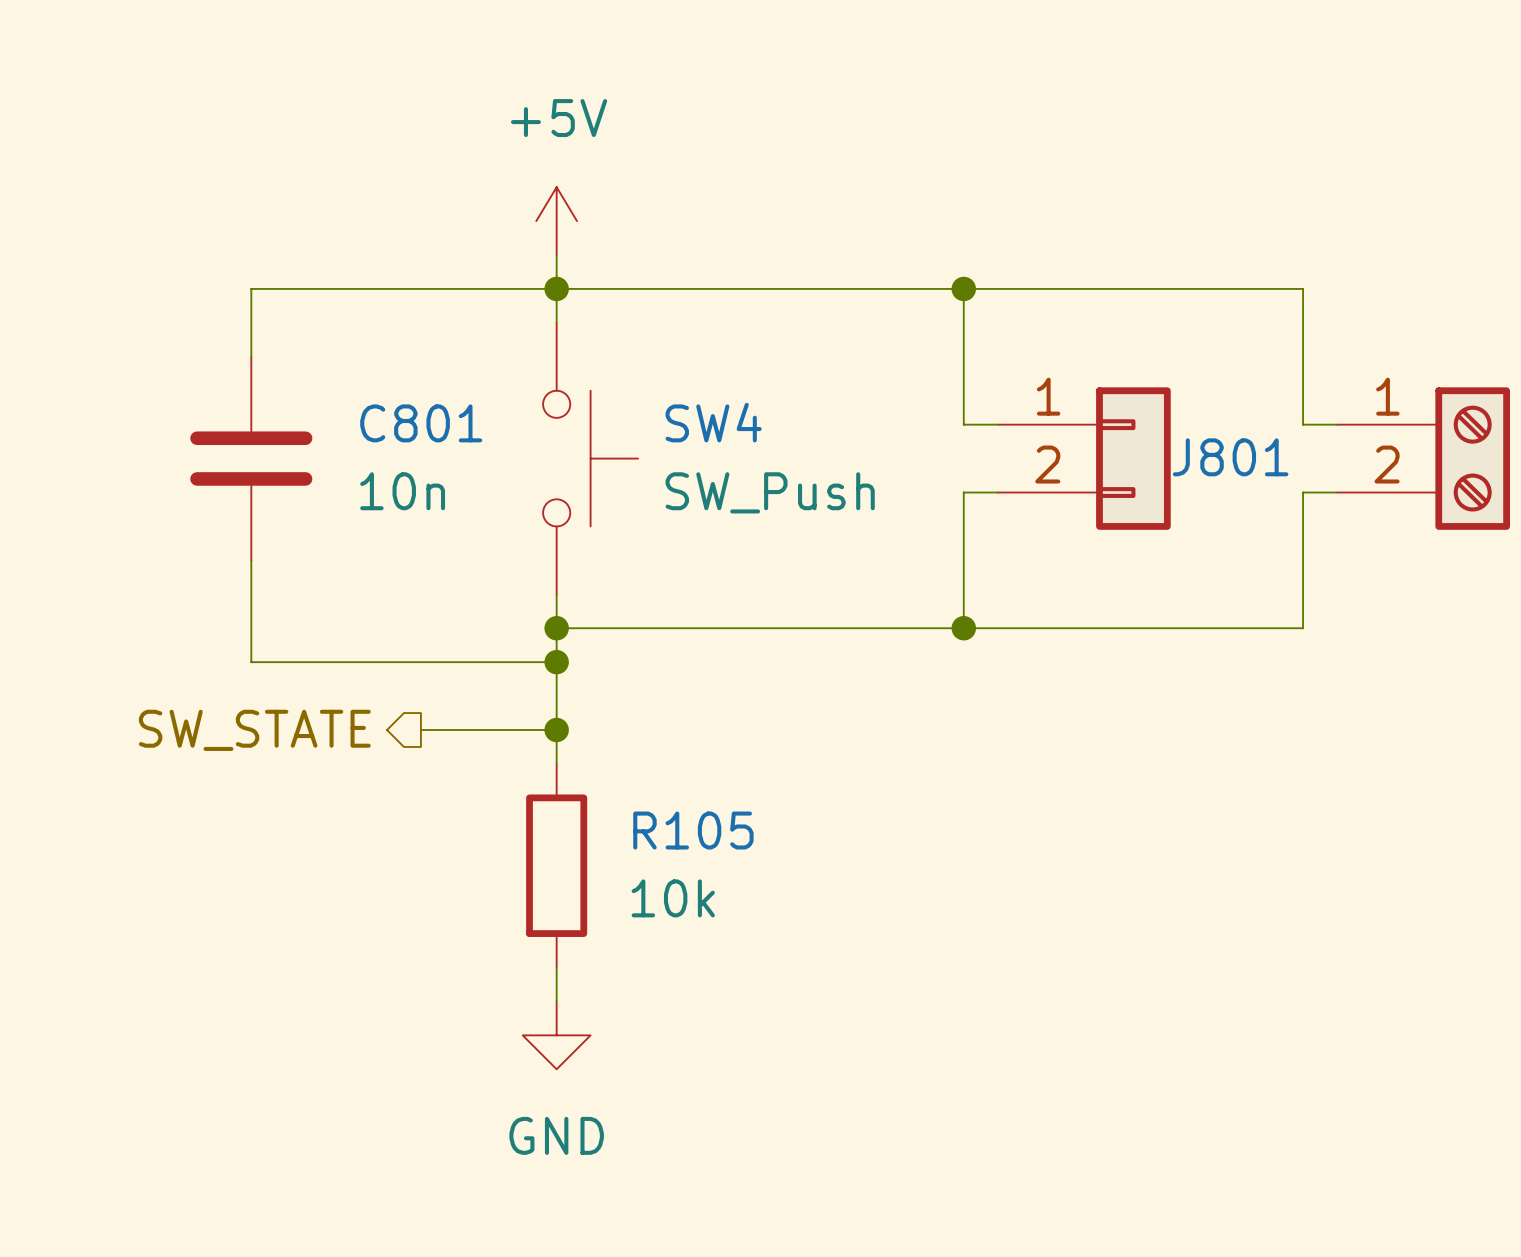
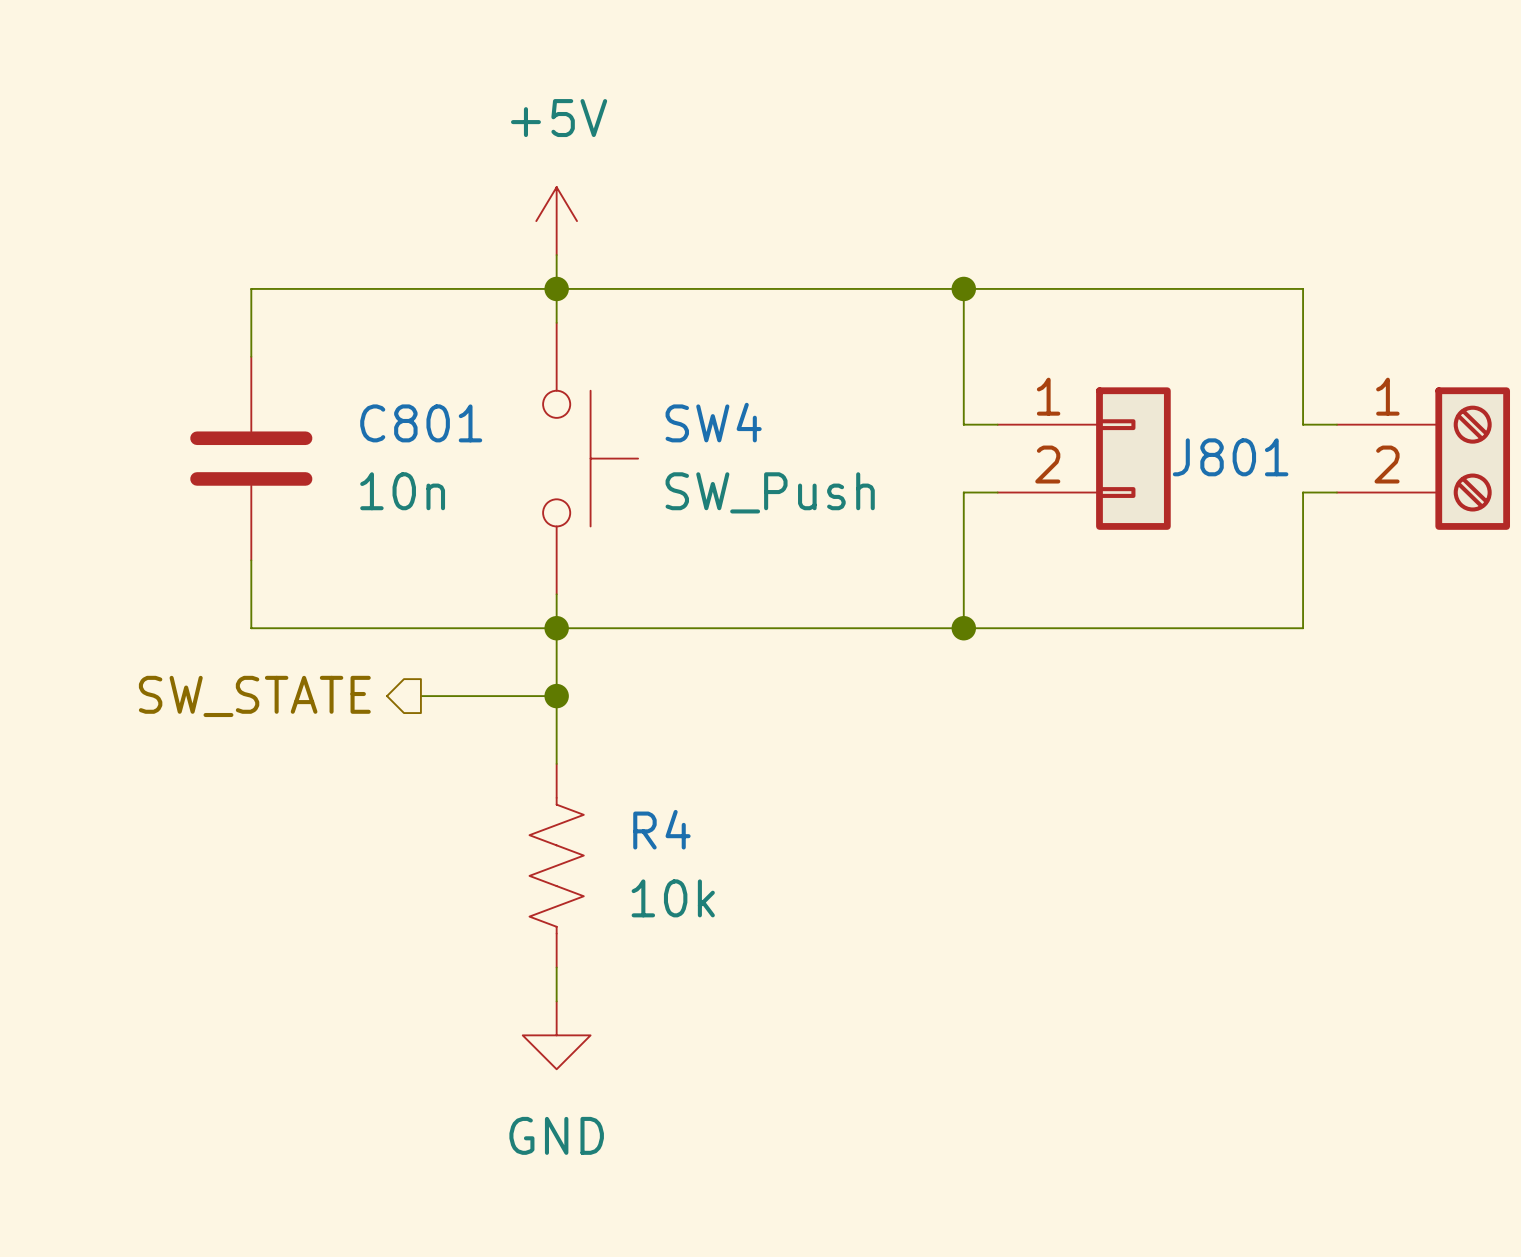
wire: (251, 628) (251, 662) (556, 662) -> (251, 628) (556, 628)
junction: (556, 662) -> none
junction: none -> (556, 696)
hierarchical label position: SW_STATE (254, 730) -> SW_STATE (254, 696)
wire: (420, 730) (556, 730) -> (420, 696) (556, 696)
junction: (556, 730) -> none
R105: 10k (556, 865) -> none
R4: none -> 10k (556, 865)

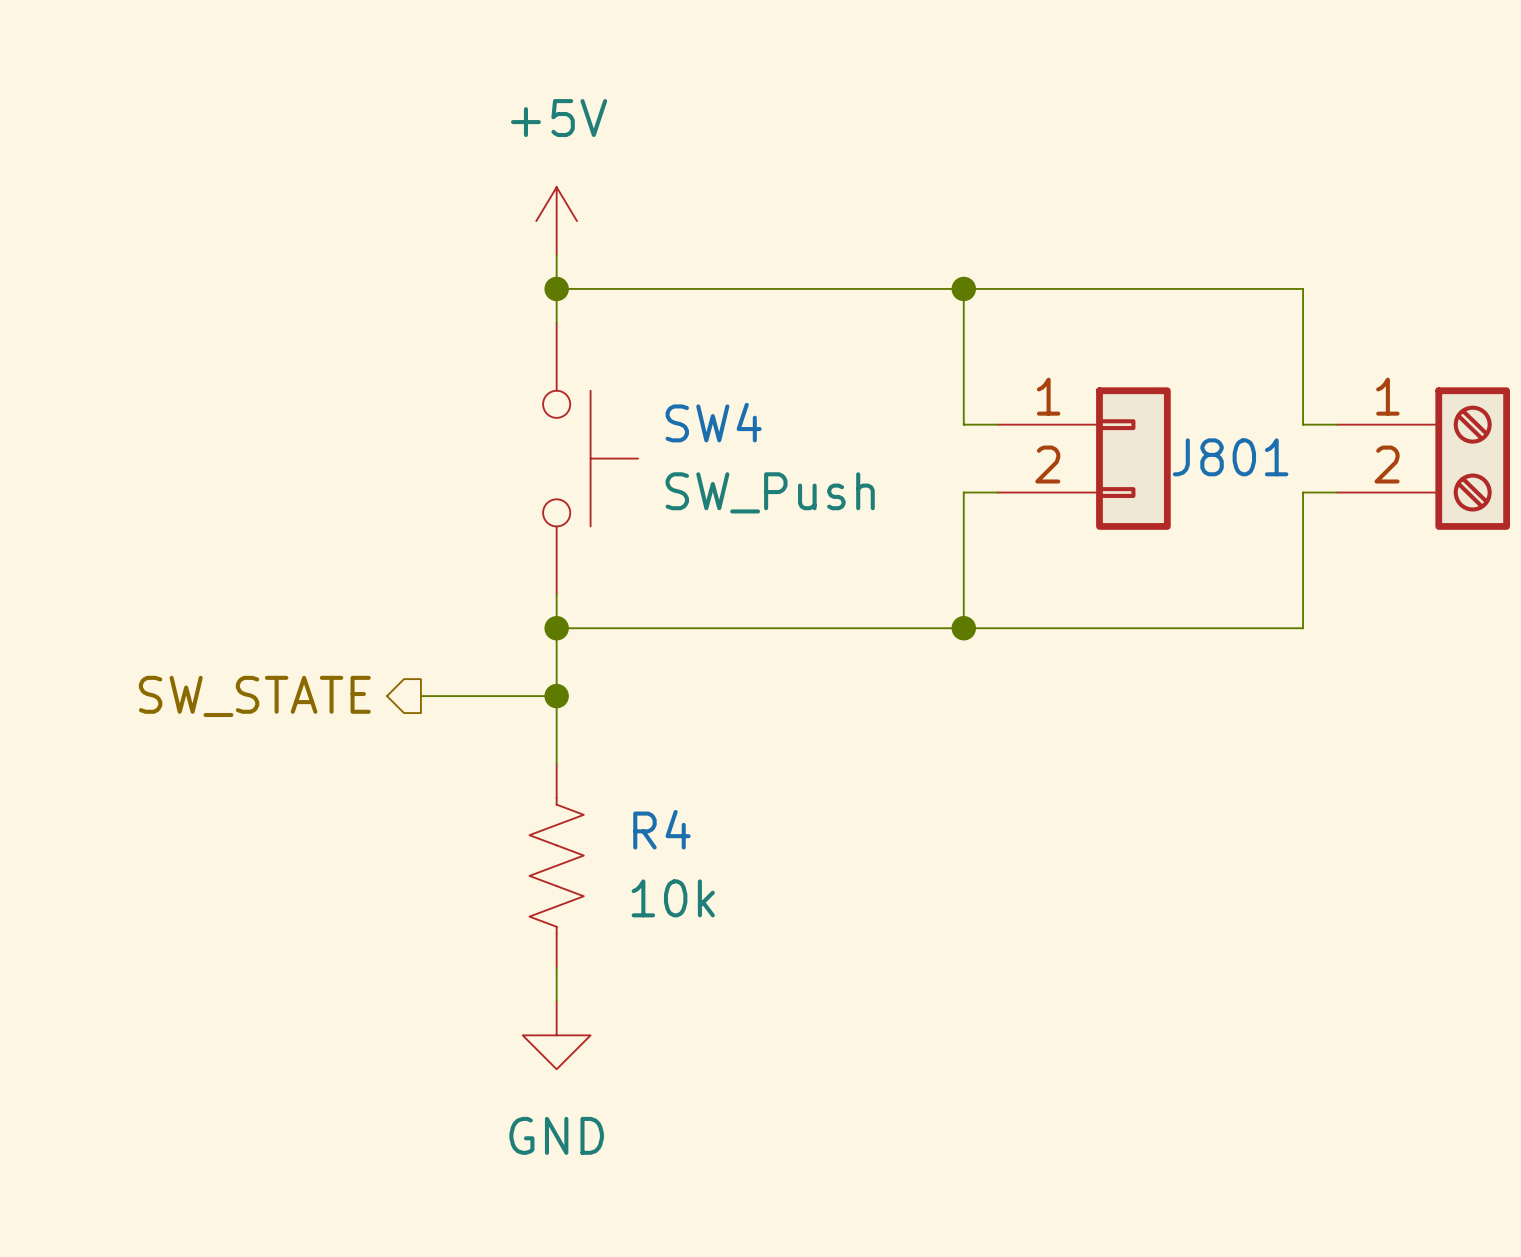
wire: (556, 288) (251, 288) (251, 356) -> none
C801: 10n (251, 458) -> none
wire: (251, 560) (251, 628) (556, 628) -> none

